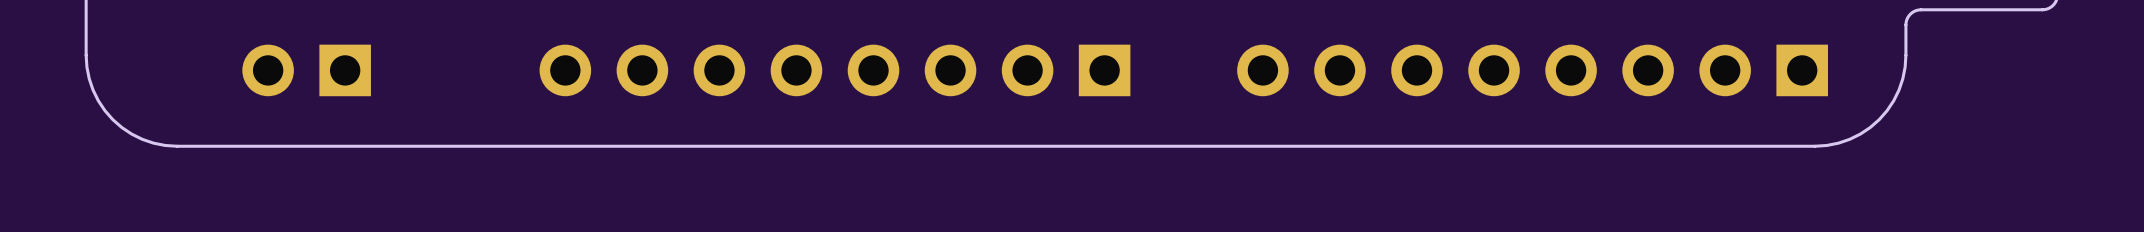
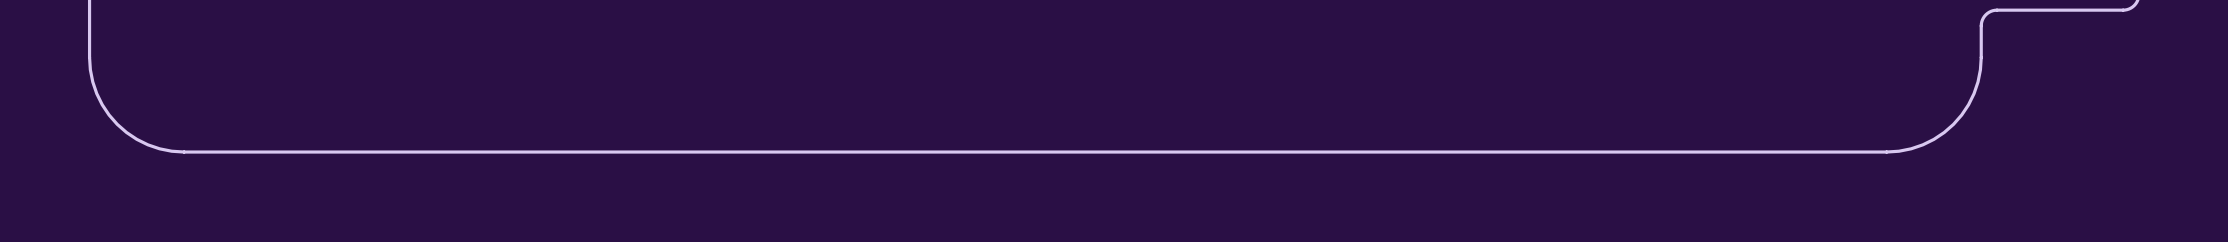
part: (306, 70) -> none
part: (834, 70) -> none
part: (1532, 70) -> none

